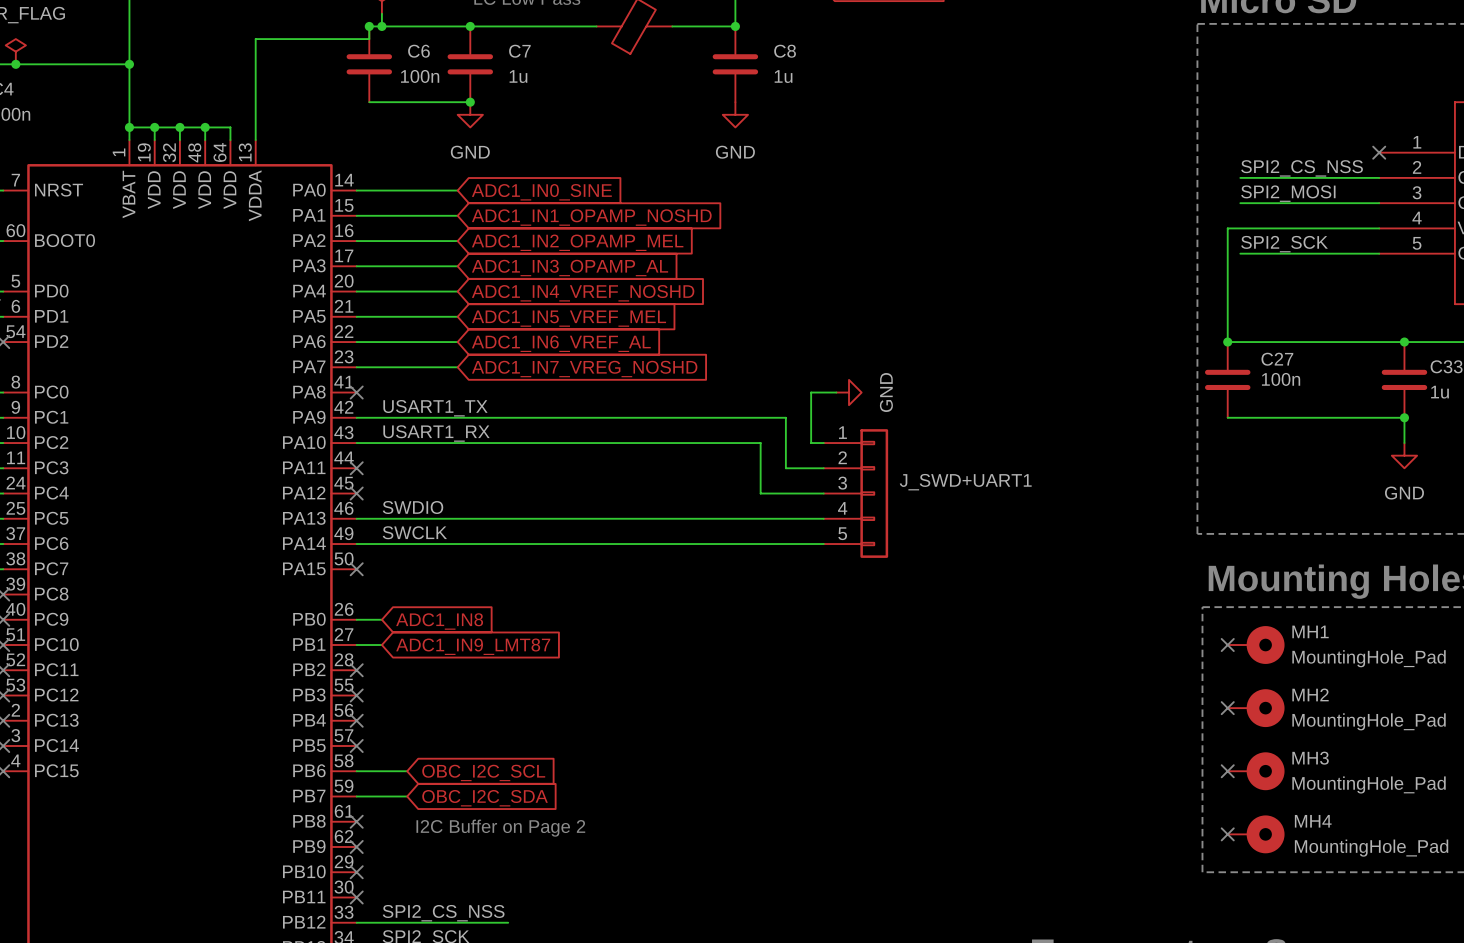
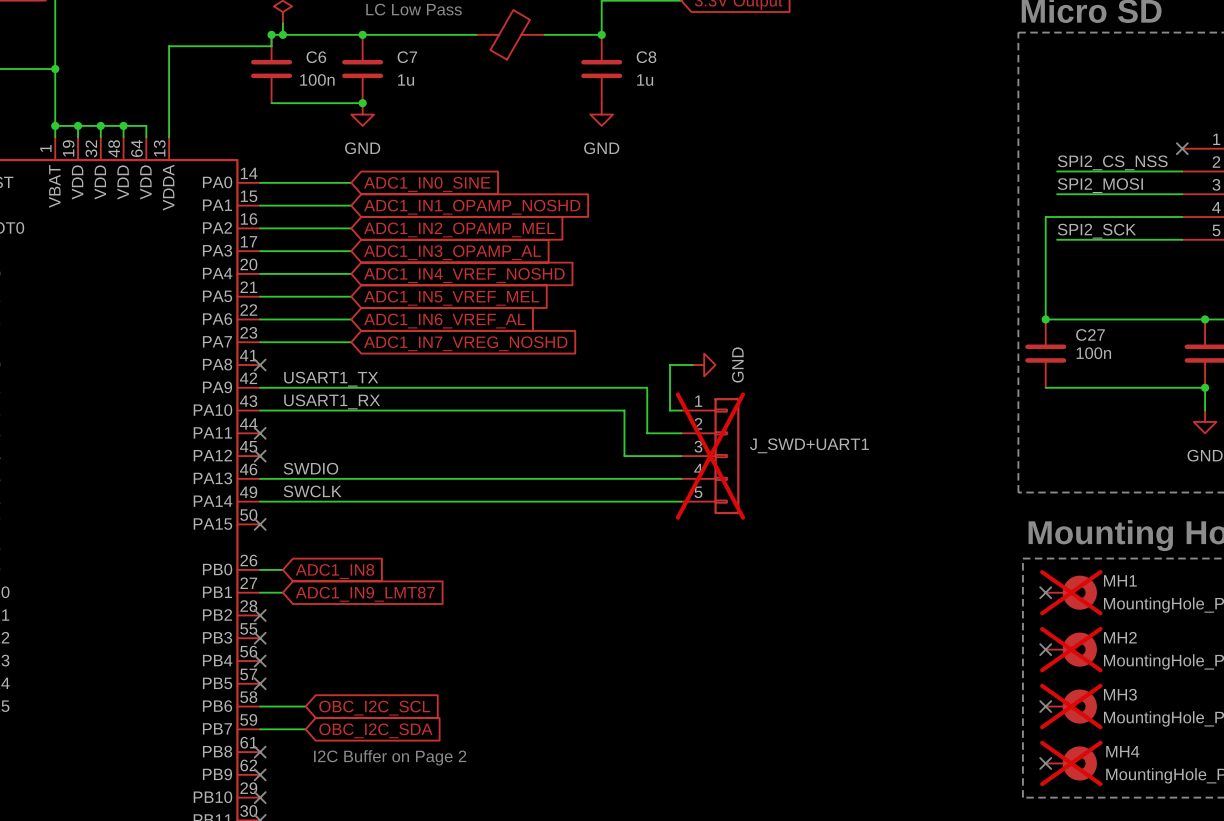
J_SWD+UART1 do-not-place cross: none -> (710, 456)
MH1 do-not-place cross: none -> (1071, 592)
MH2 do-not-place cross: none -> (1071, 649)
MH3 do-not-place cross: none -> (1071, 706)
MH4 do-not-place cross: none -> (1071, 763)

